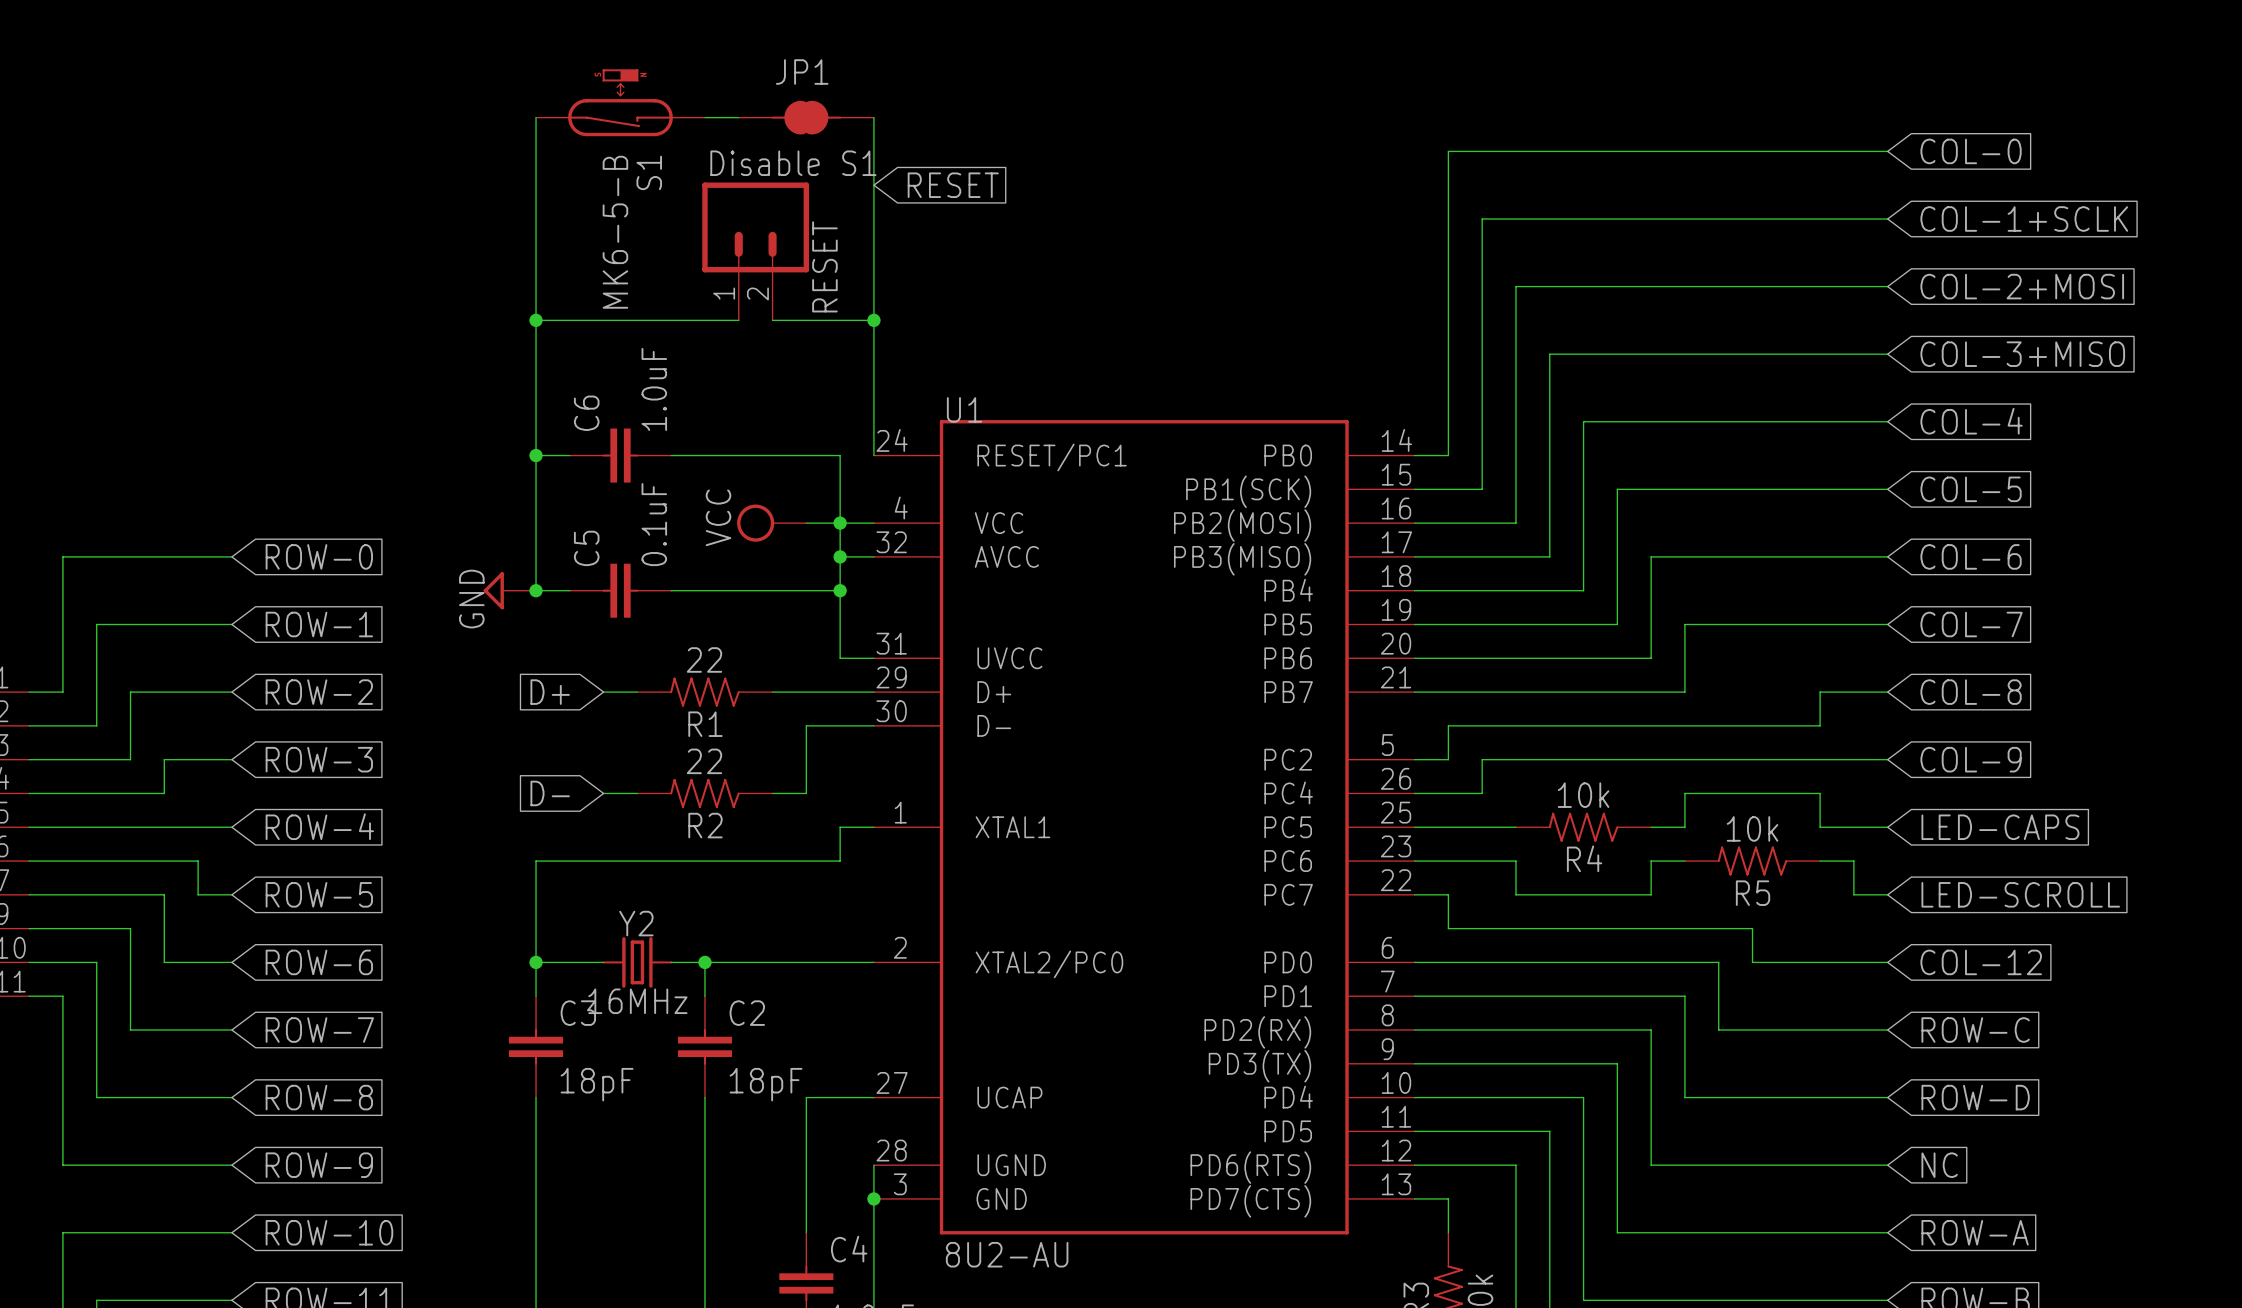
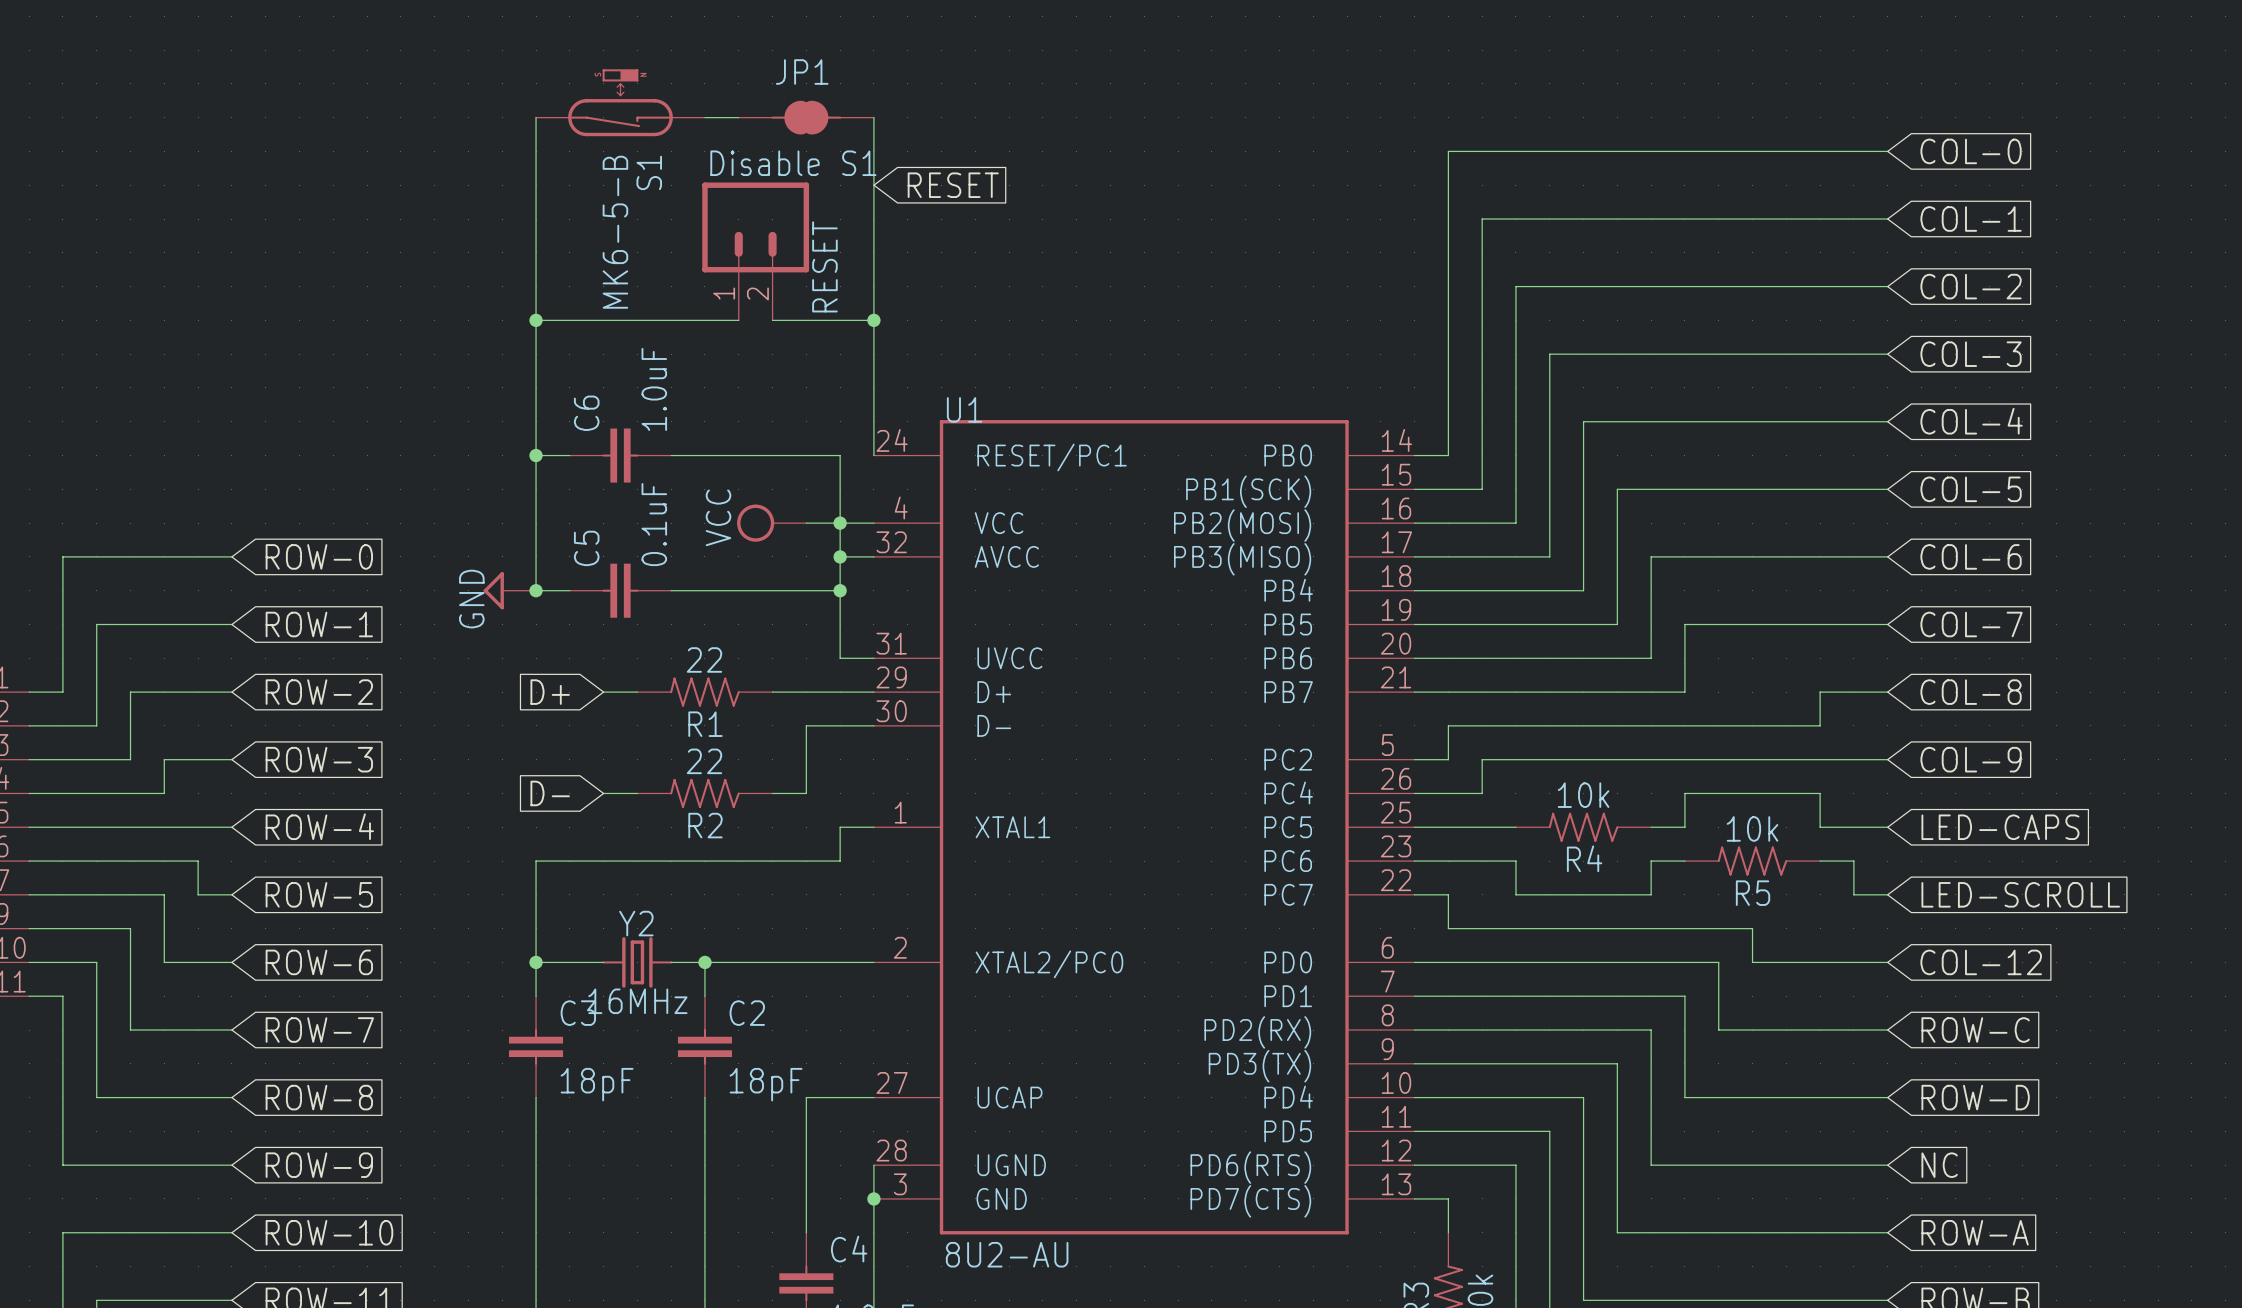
global label: COL-1+SCLK (2024, 219) -> COL-1 (1971, 219)
global label: COL-2+MOSI (2022, 286) -> COL-2 (1971, 286)
global label: COL-3+MISO (2022, 354) -> COL-3 (1971, 354)

